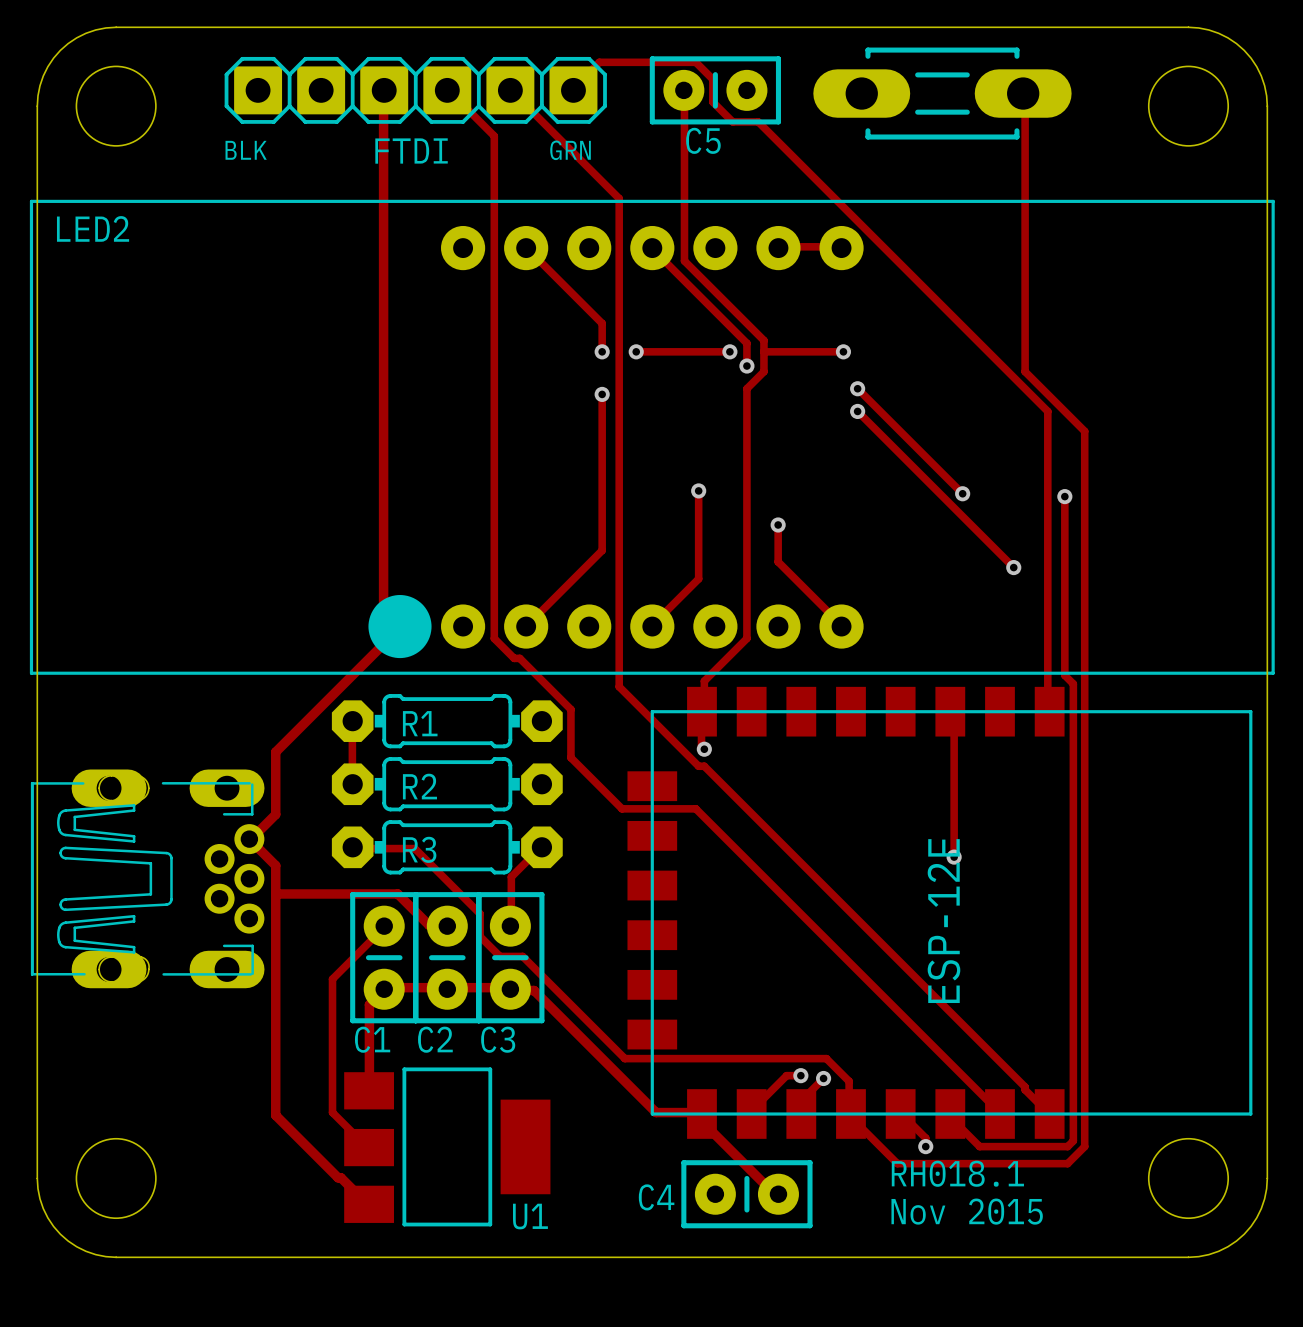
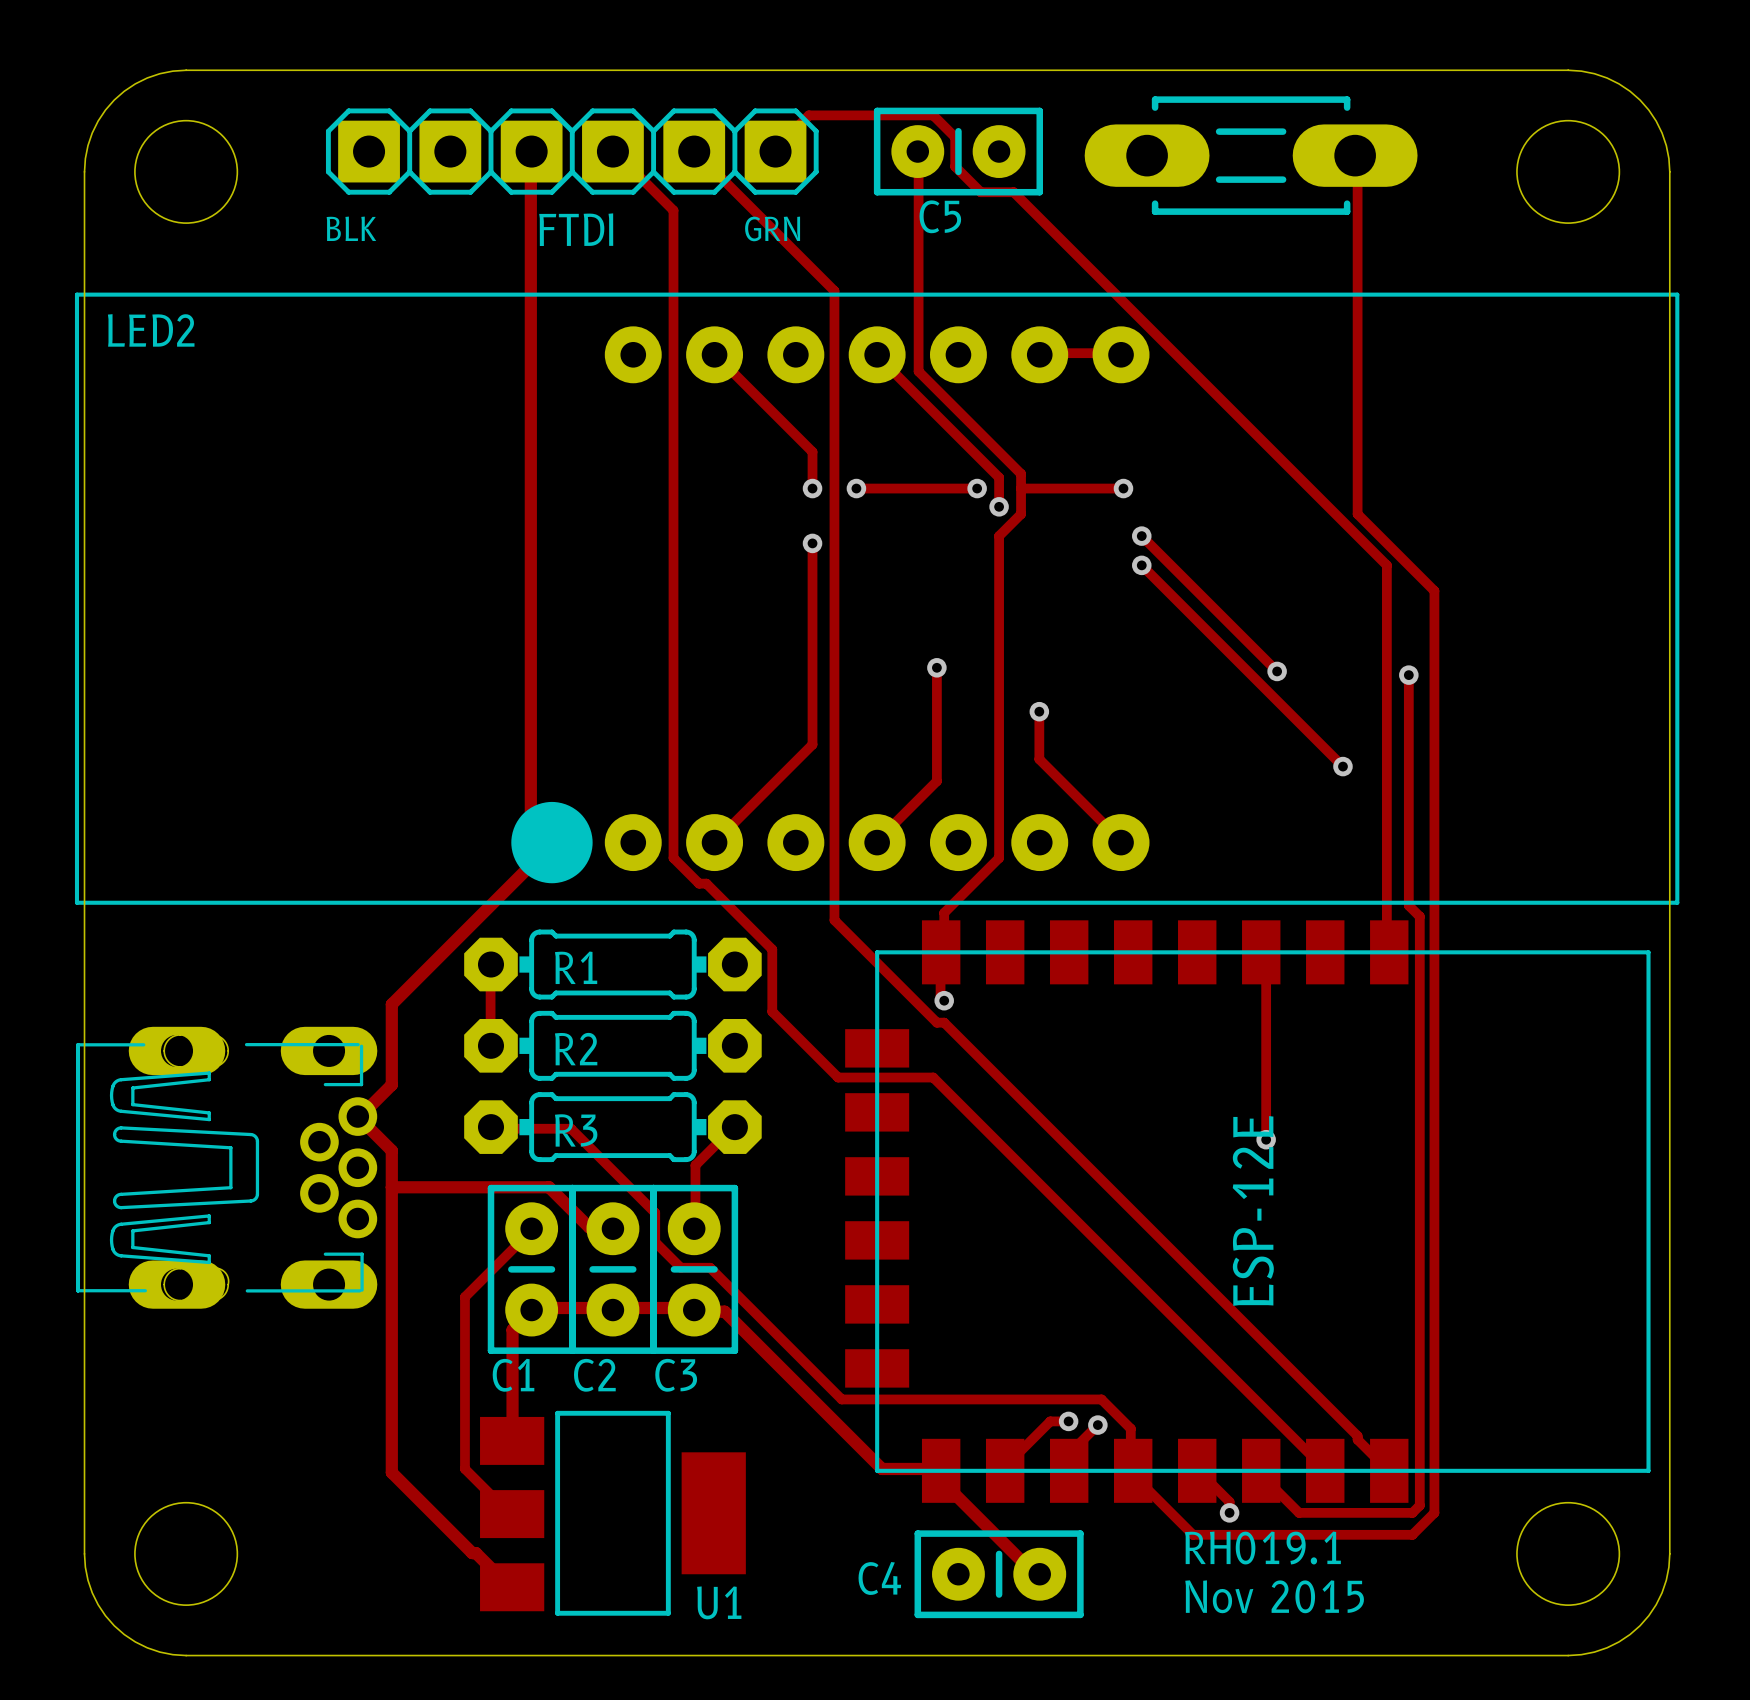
text: RH018.1 (957, 1173) -> RH019.1 (1262, 1548)

